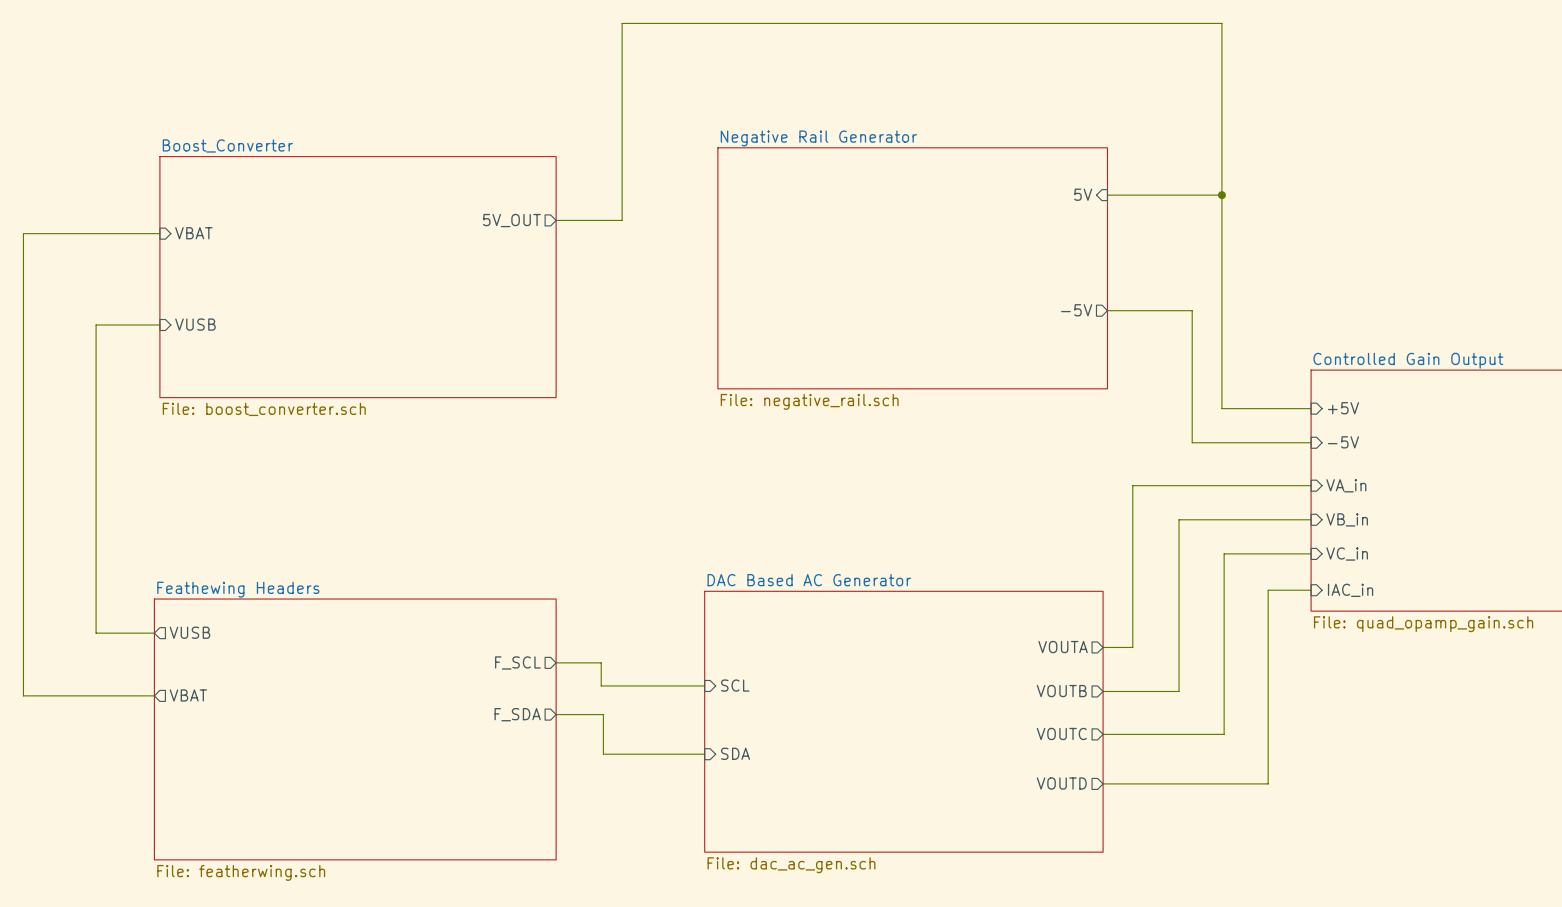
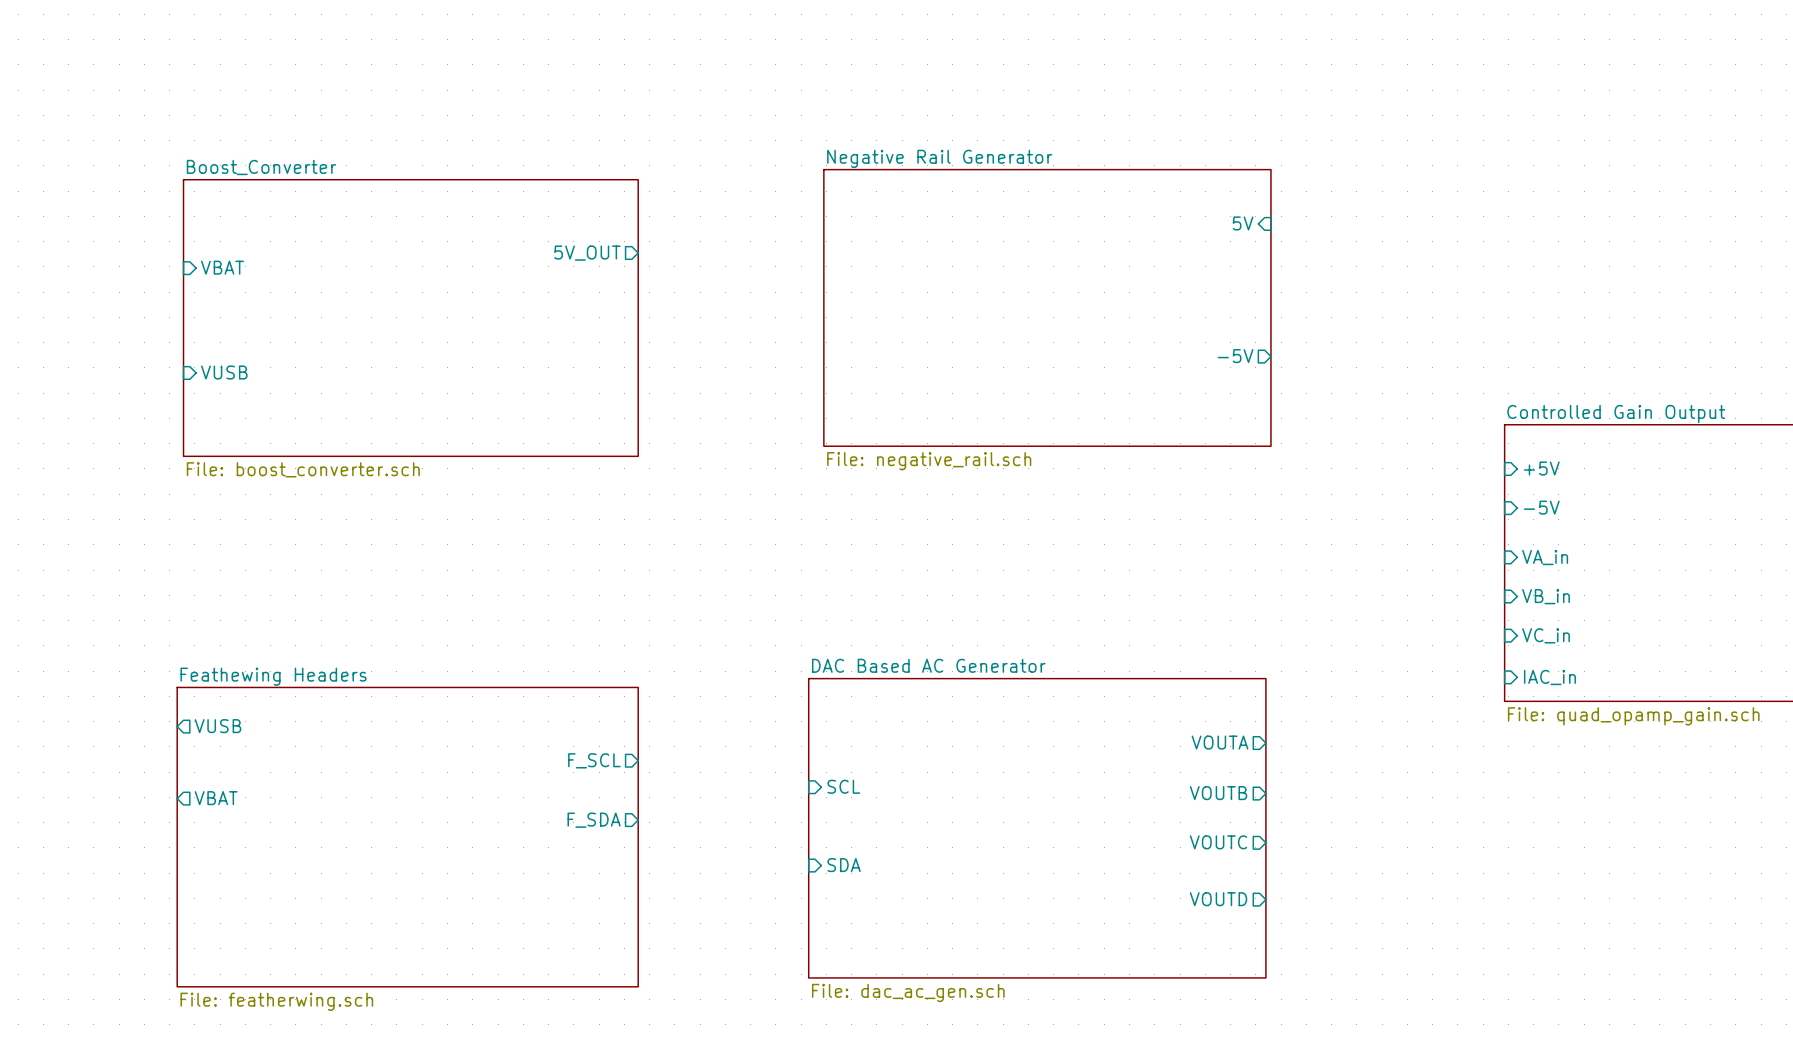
wire: (1107, 195) (1221, 195) -> none
junction: (1221, 195) -> none
wire: (556, 220) (622, 220) (622, 23) (1221, 23) (1221, 408) (1311, 408) -> none
wire: (159, 233) (23, 233) (23, 695) (154, 695) -> none
wire: (1107, 310) (1192, 310) (1192, 442) (1311, 442) -> none
wire: (159, 324) (96, 324) (96, 633) (154, 633) -> none
wire: (1311, 485) (1132, 485) (1132, 647) (1103, 647) -> none
wire: (1311, 519) (1179, 519) (1179, 691) (1103, 691) -> none
wire: (1311, 553) (1224, 553) (1224, 734) (1103, 734) -> none
wire: (1311, 590) (1268, 590) (1268, 783) (1103, 783) -> none
wire: (556, 662) (601, 662) (601, 685) (704, 685) -> none
wire: (556, 714) (603, 714) (603, 754) (704, 754) -> none

